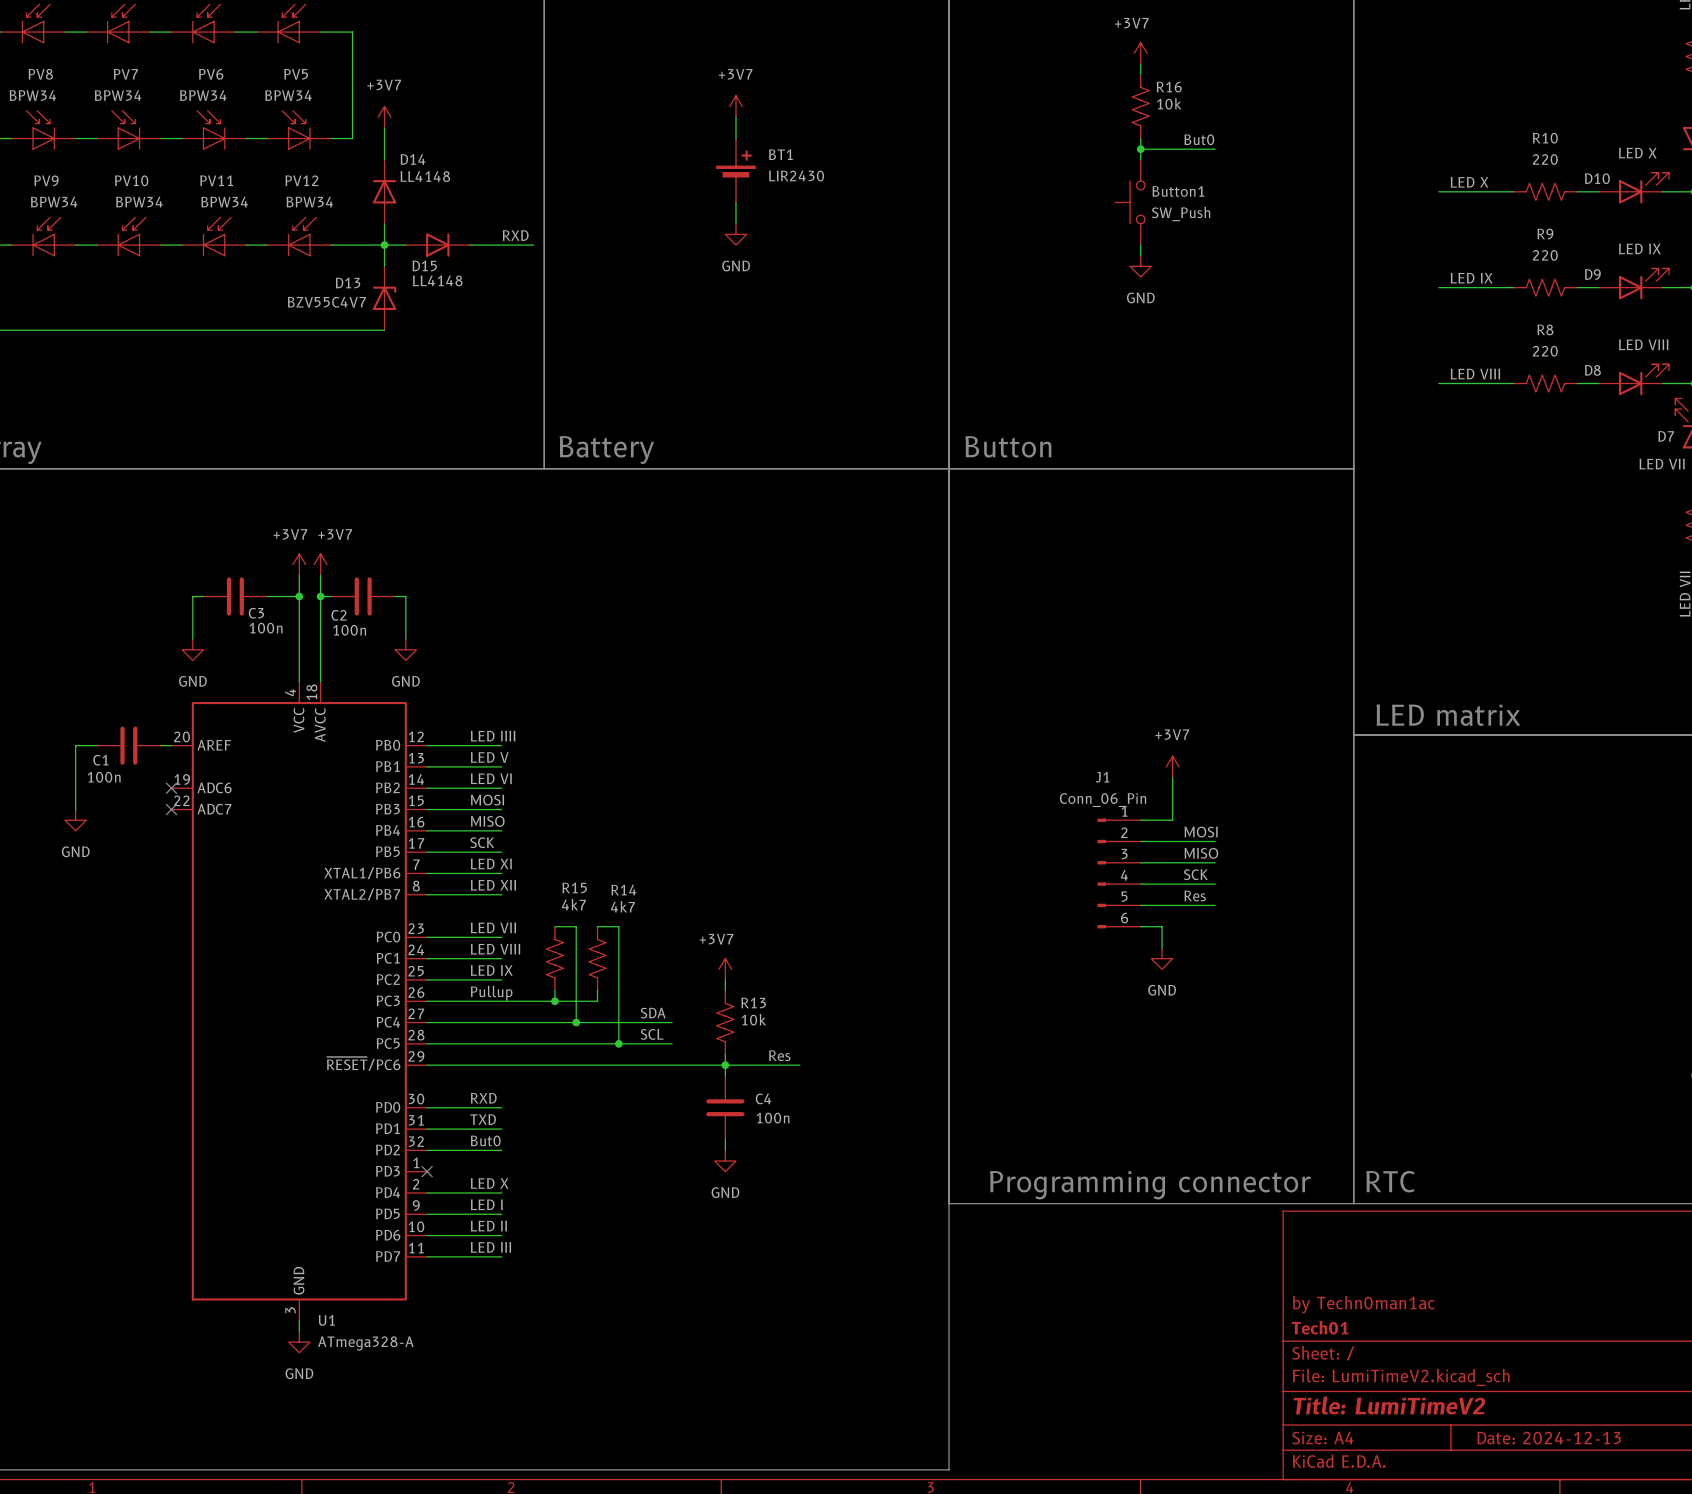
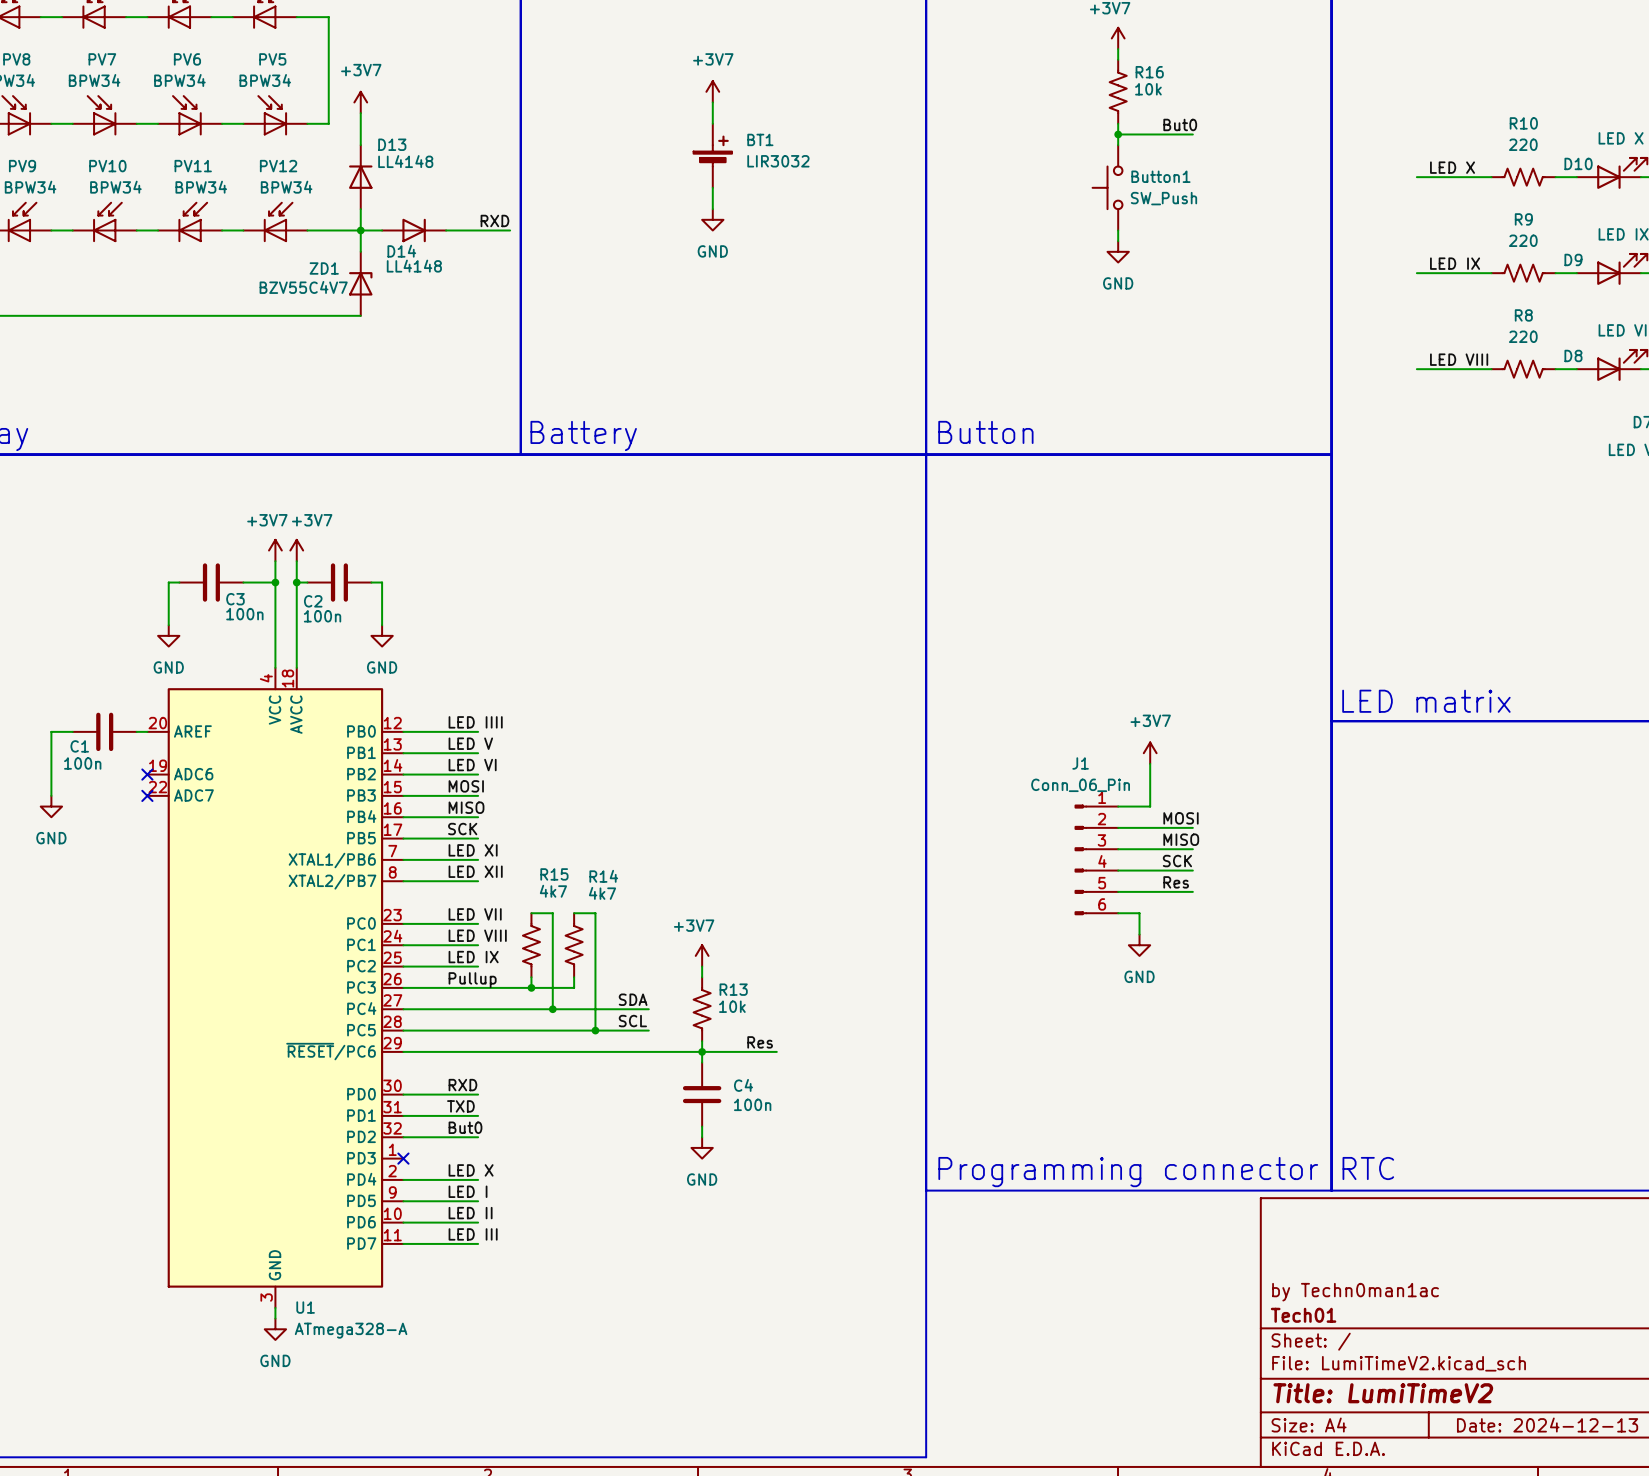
D14 name: D14 (412, 159) -> D13 (392, 144)
BT1 value: LIR2430 (796, 176) -> LIR3032 (778, 161)
D15 name: D15 (424, 265) -> D14 (401, 251)
D13 name: D13 (348, 283) -> ZD1 (324, 268)

